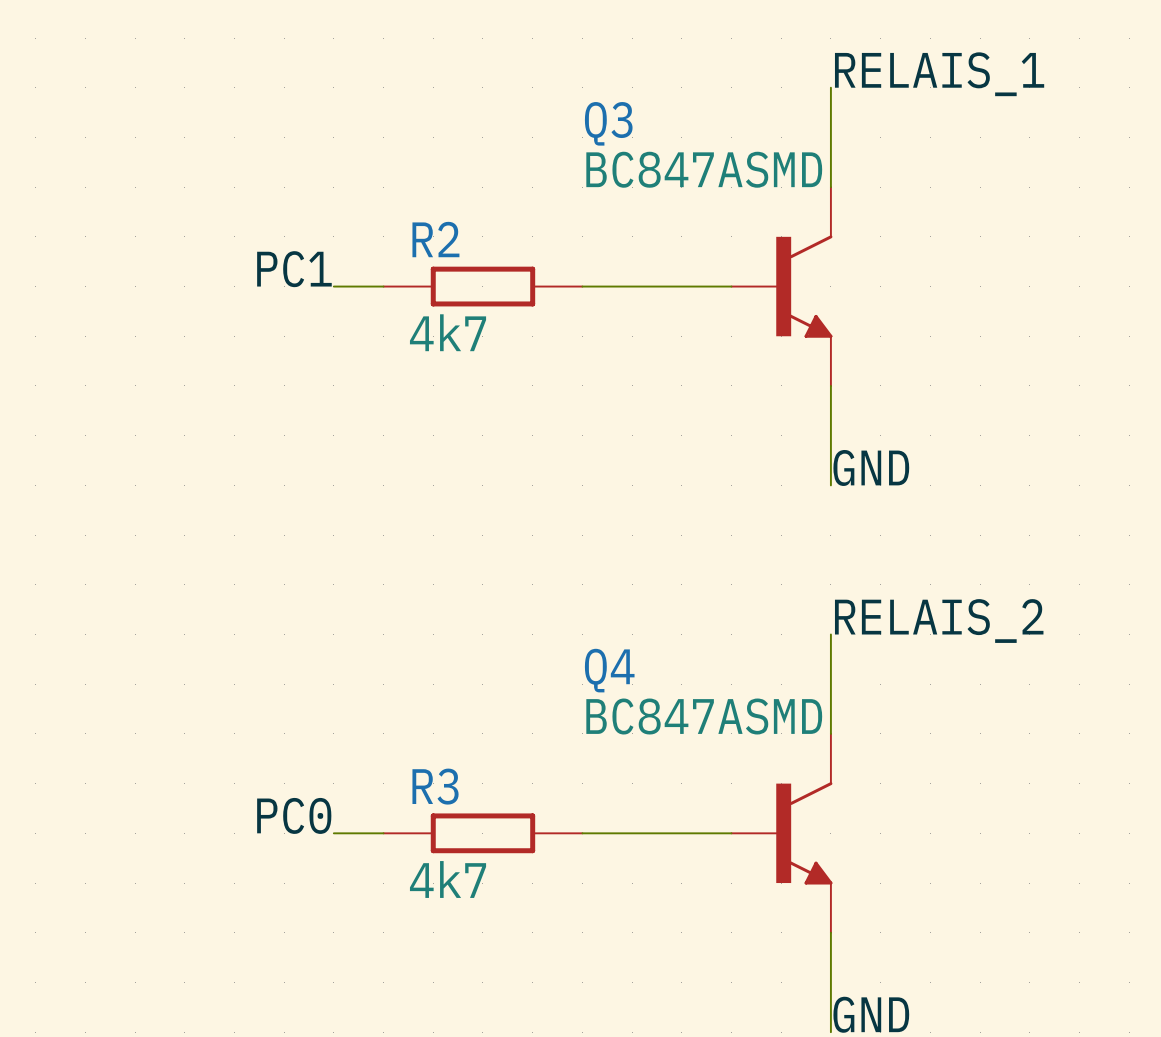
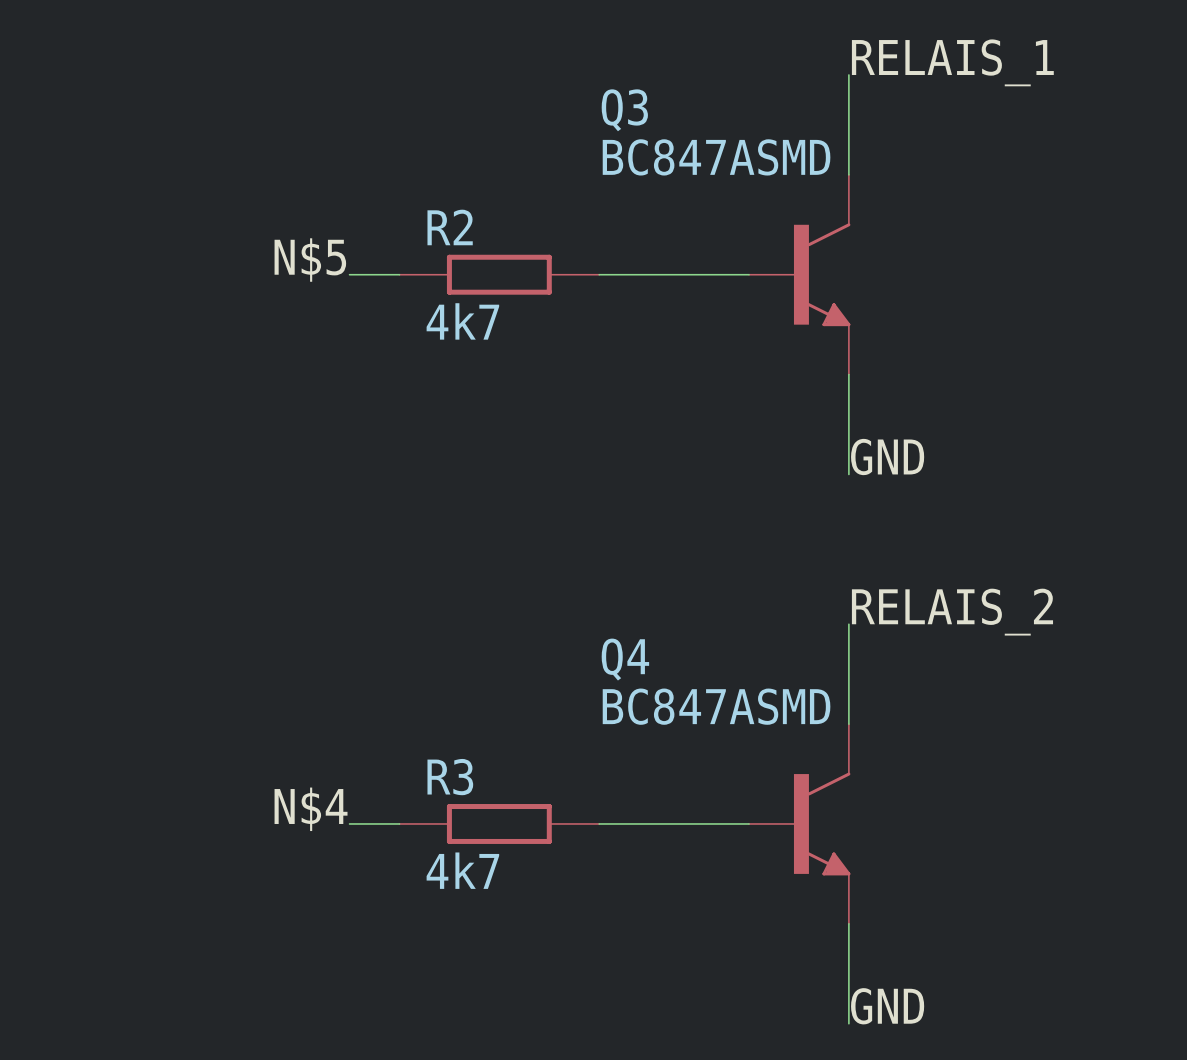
label: PC1 (294, 269) -> N$5 (310, 260)
label: PC0 (294, 815) -> N$4 (311, 809)

